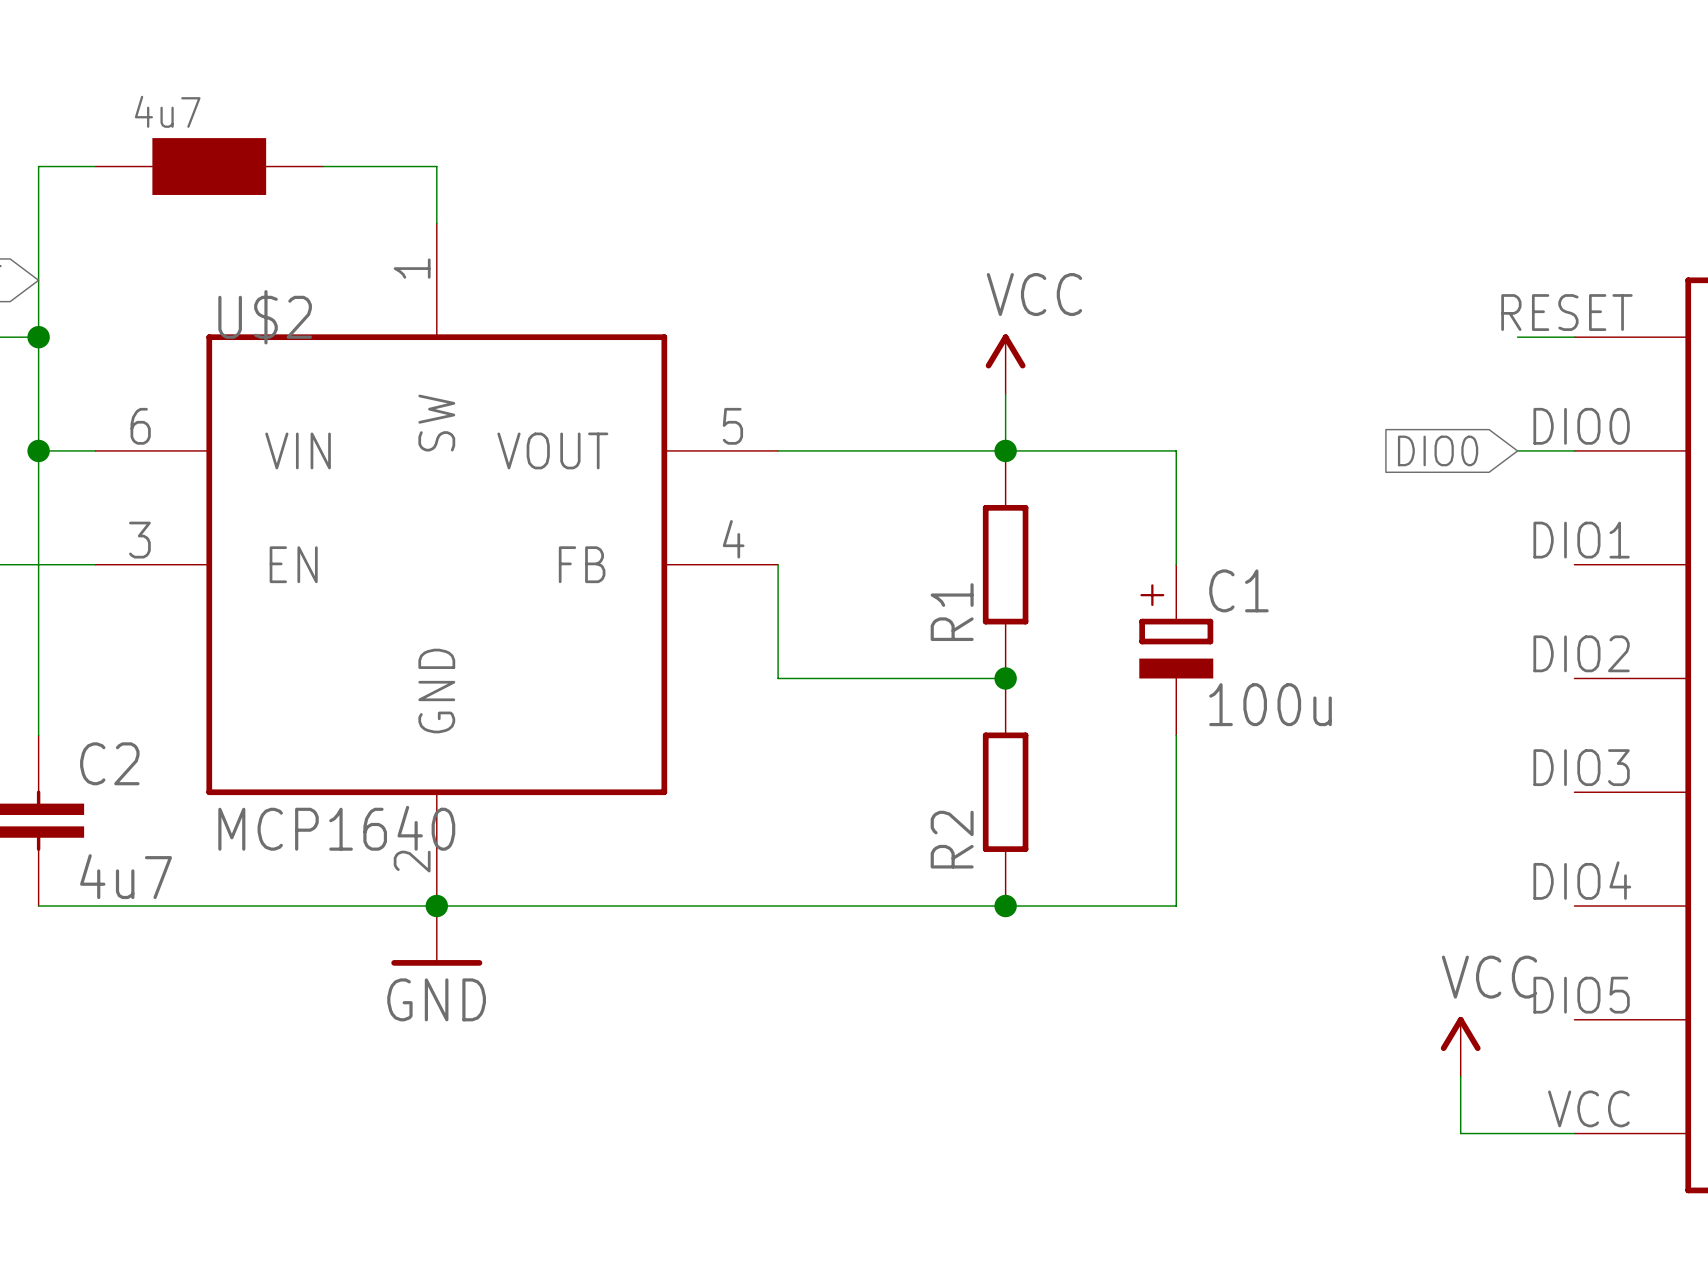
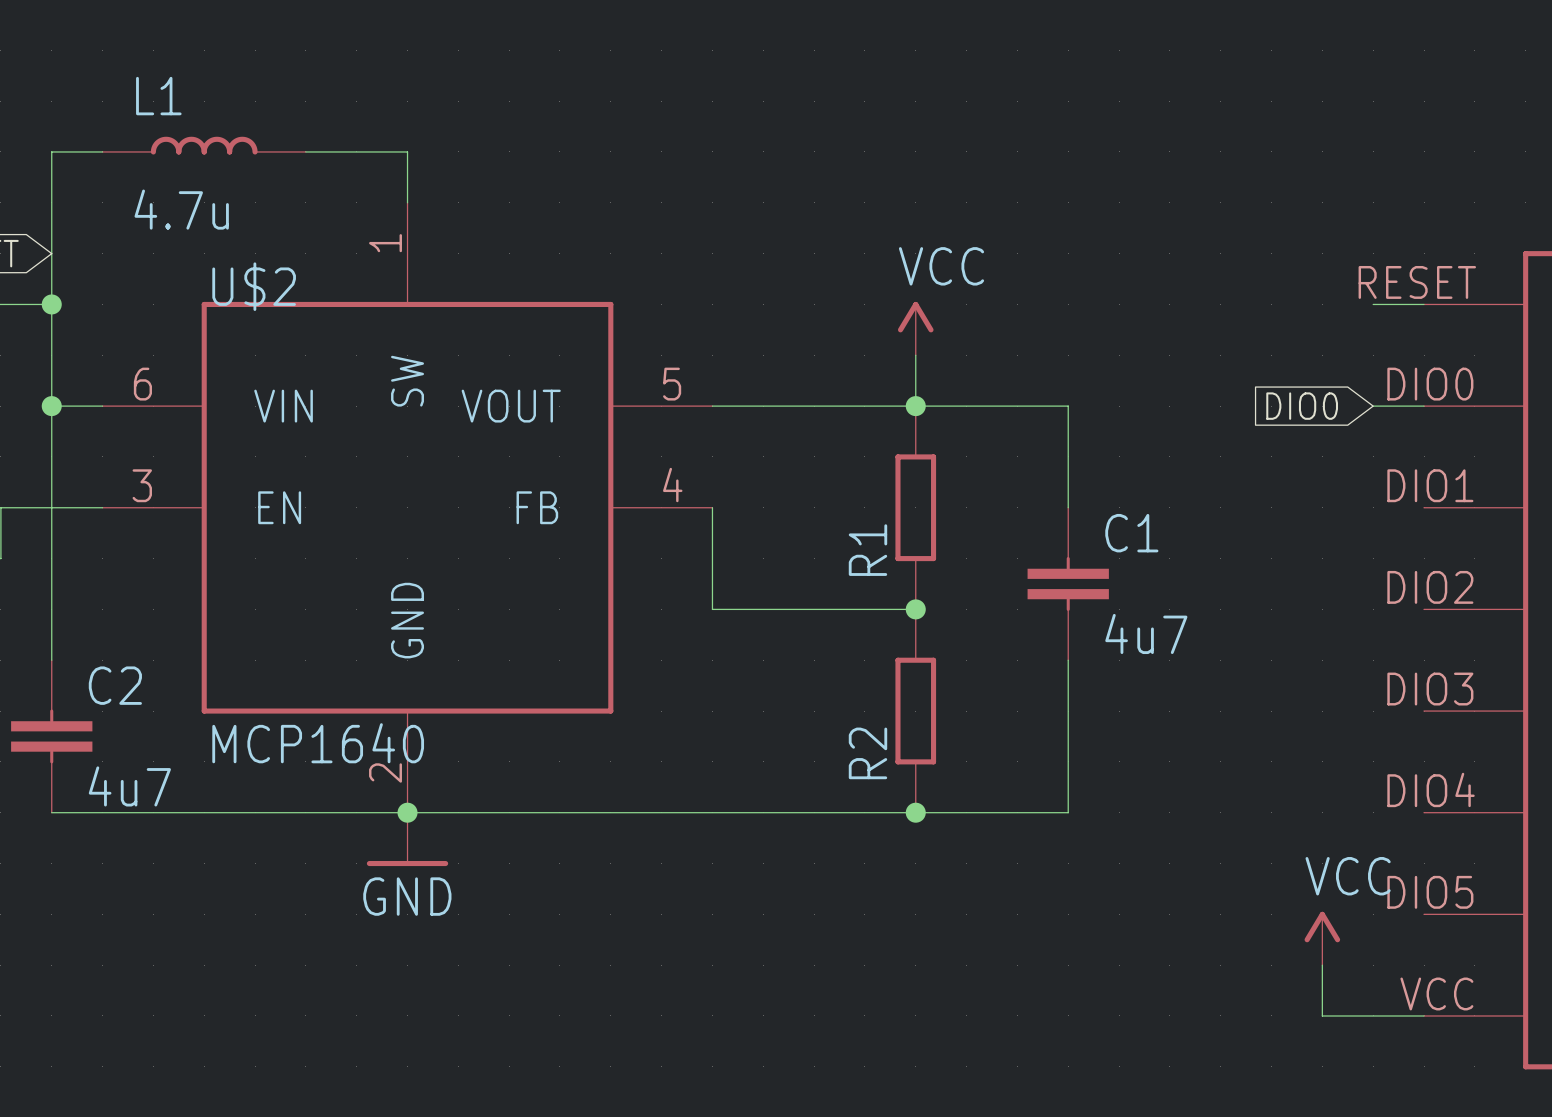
L1: none -> 4.7u (204, 145)
part: 4u7 (209, 166) -> none
C1 symbol: [1139, 564, 1214, 736] -> [1027, 507, 1109, 661]
C1 value: 100u (1270, 704) -> 4u7 (1146, 633)

